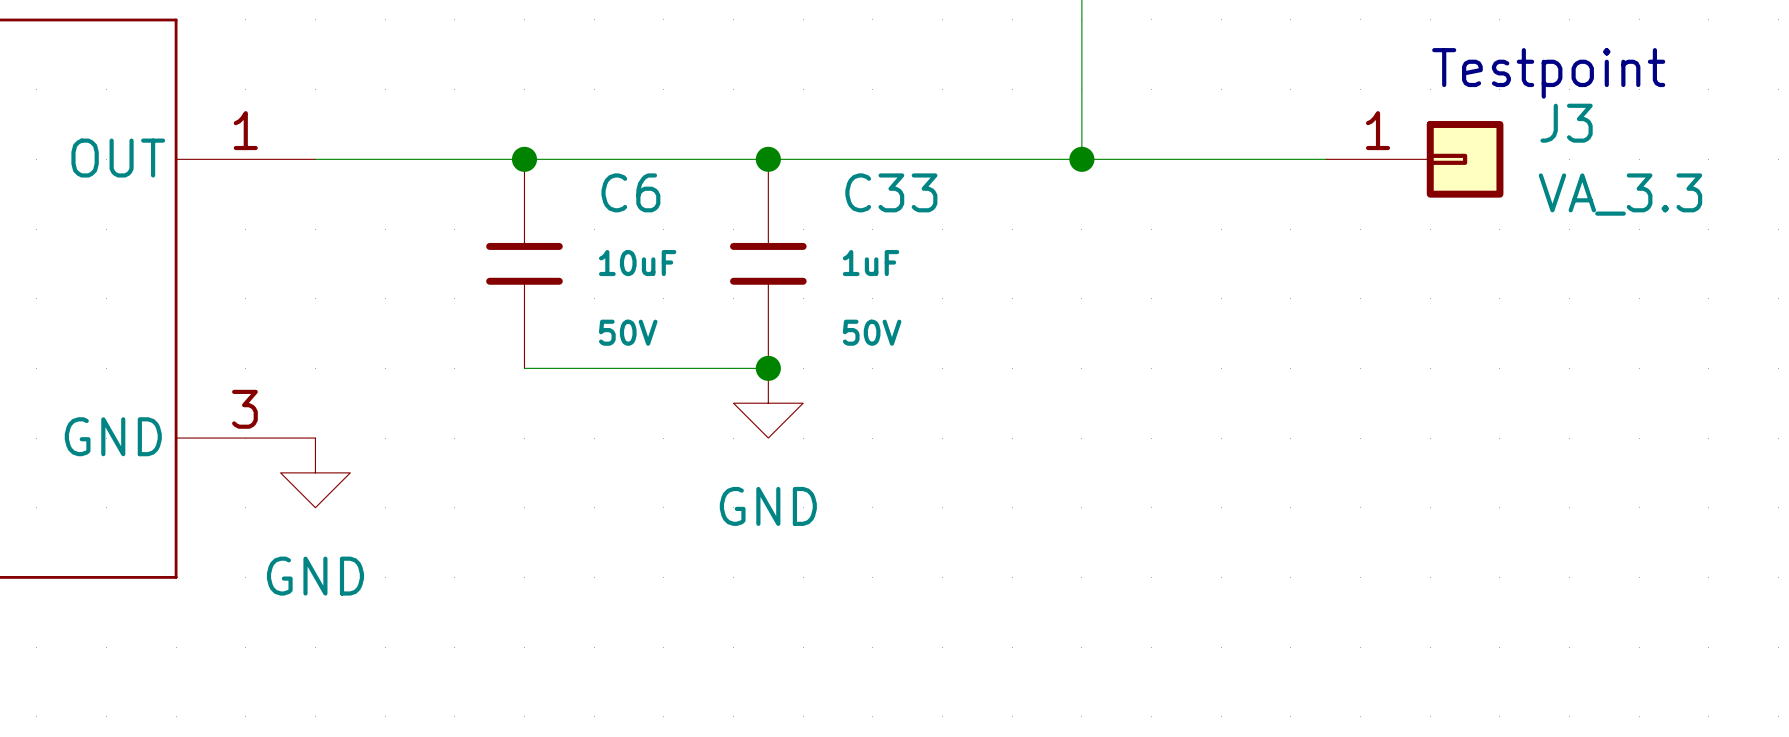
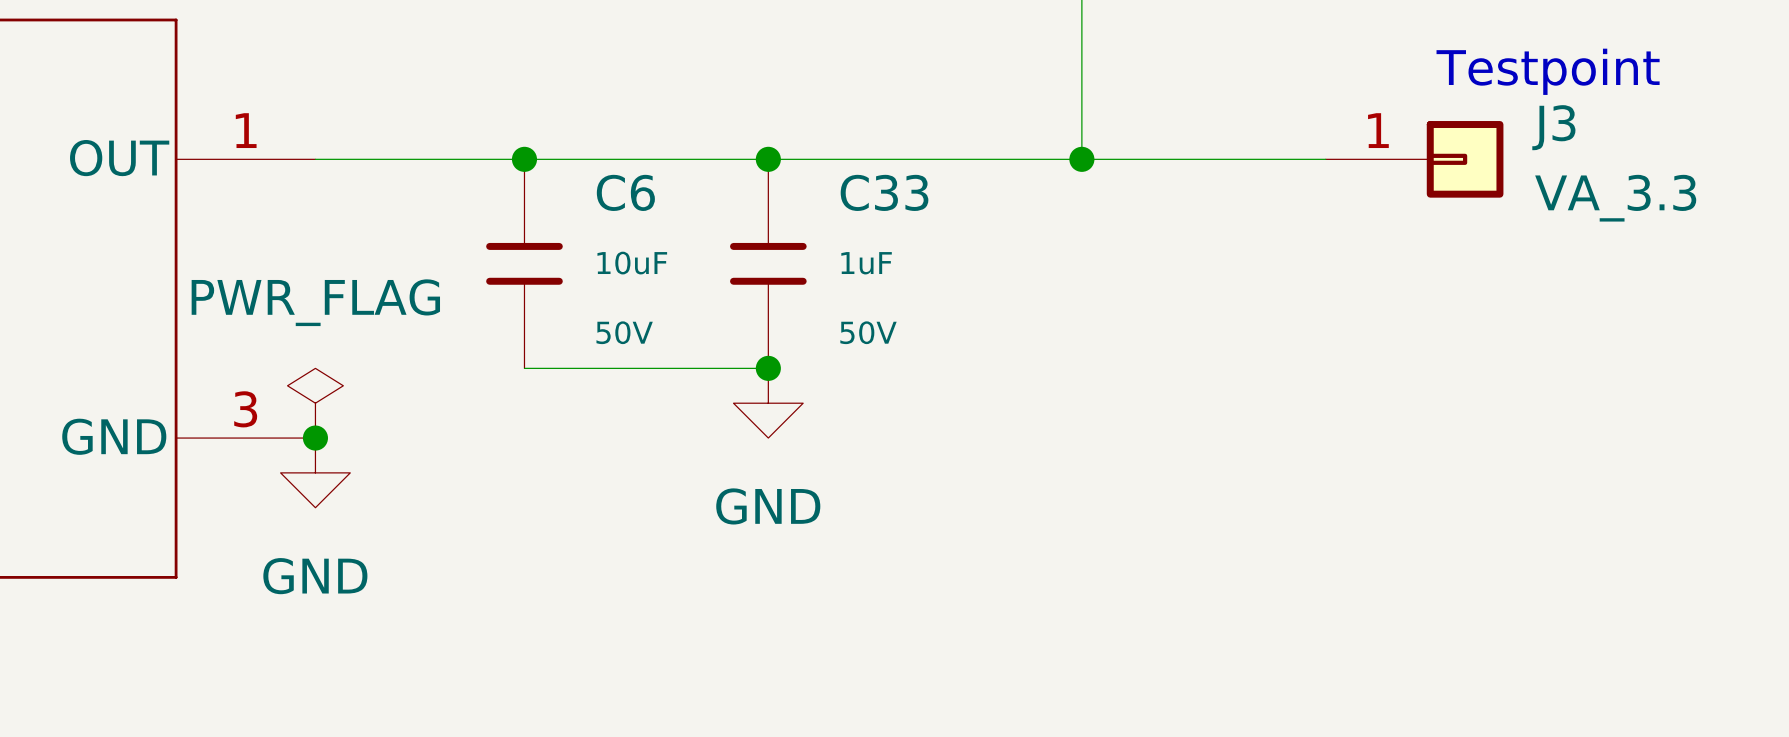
power symbol: none -> PWR_FLAG (315, 403)
junction: none -> (315, 438)

